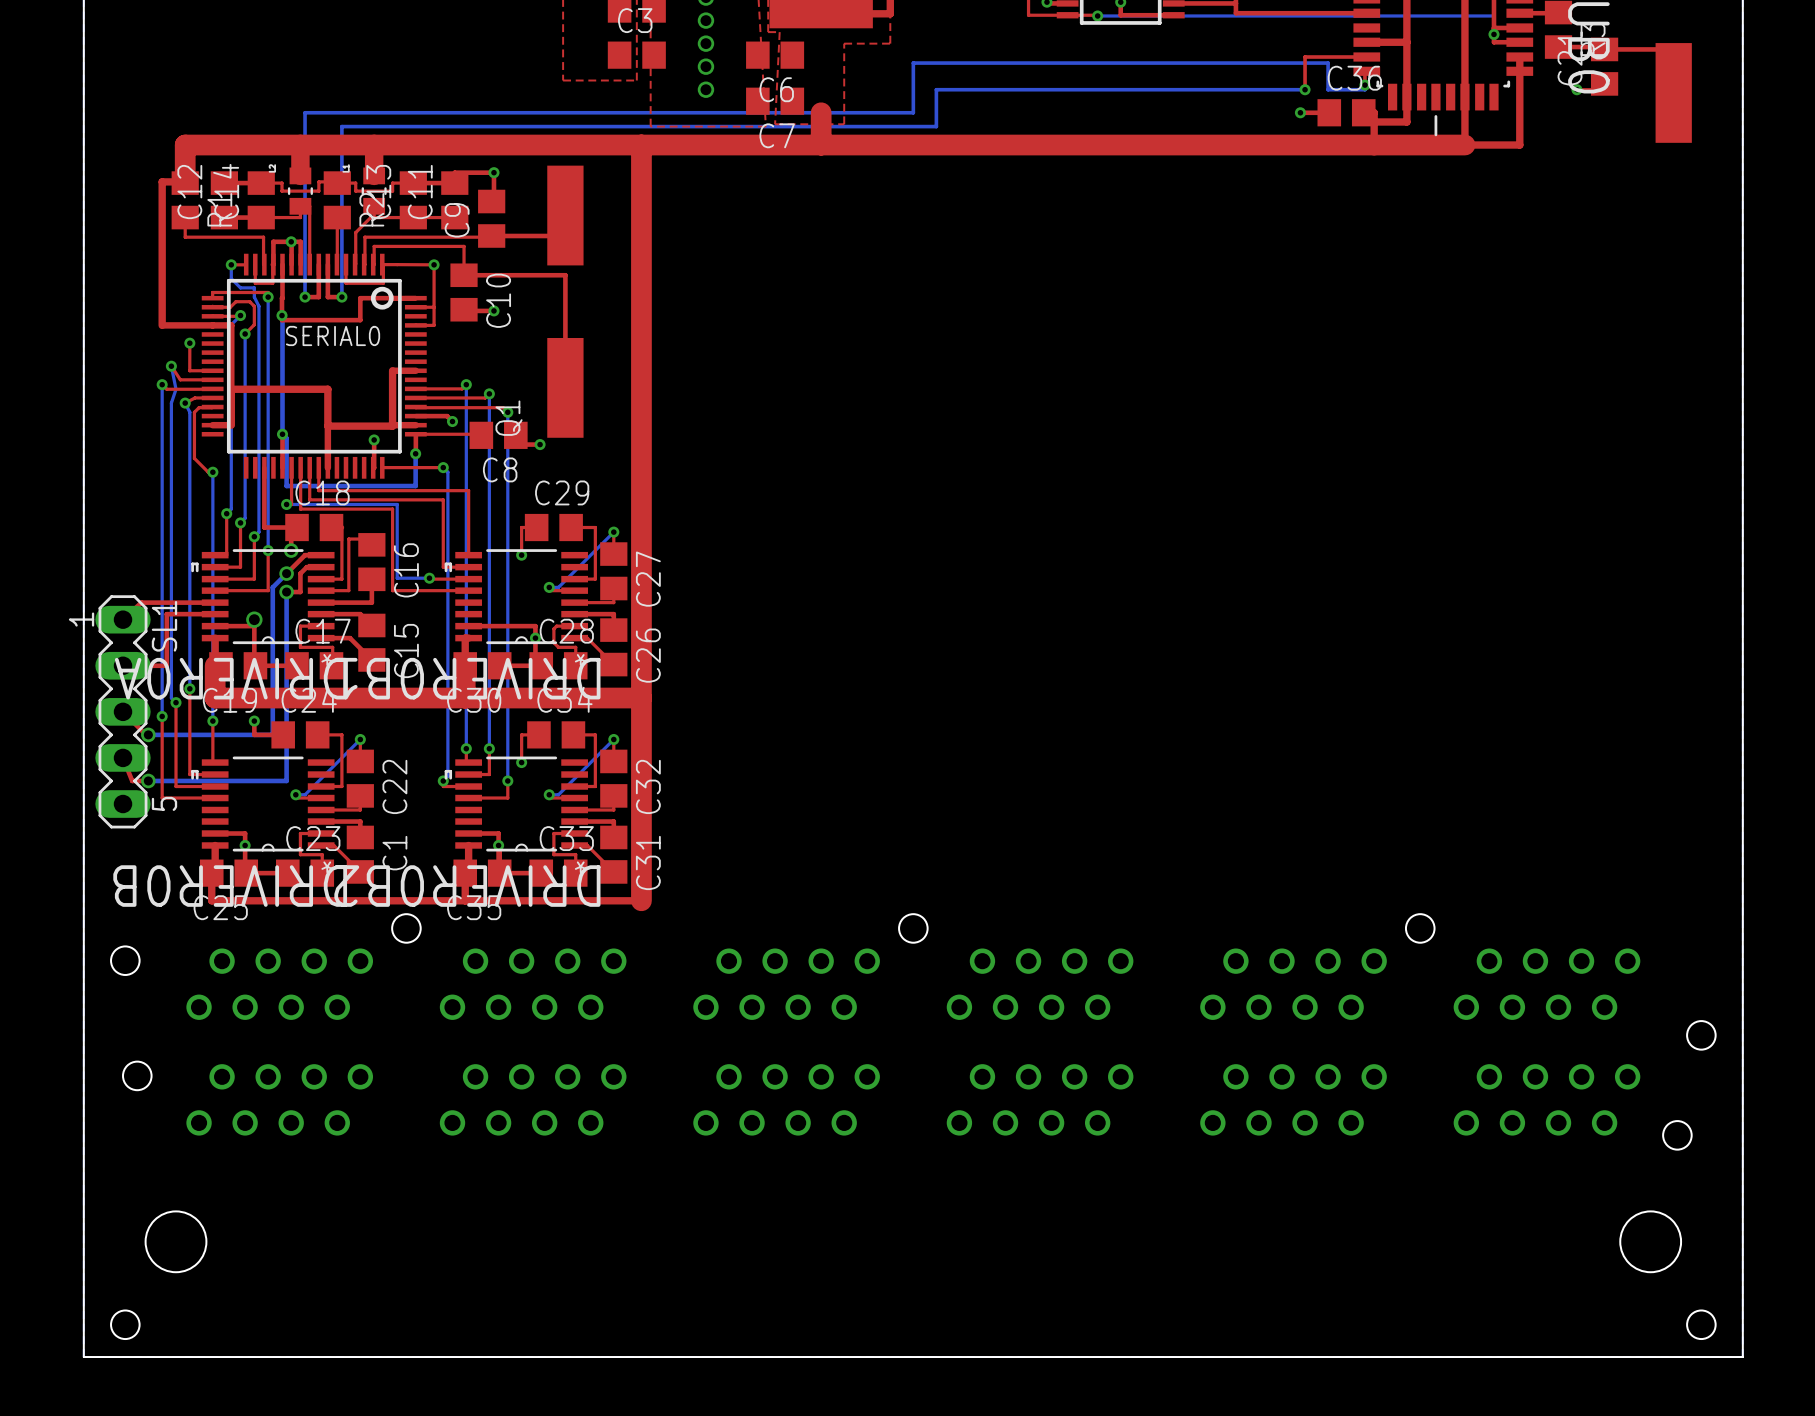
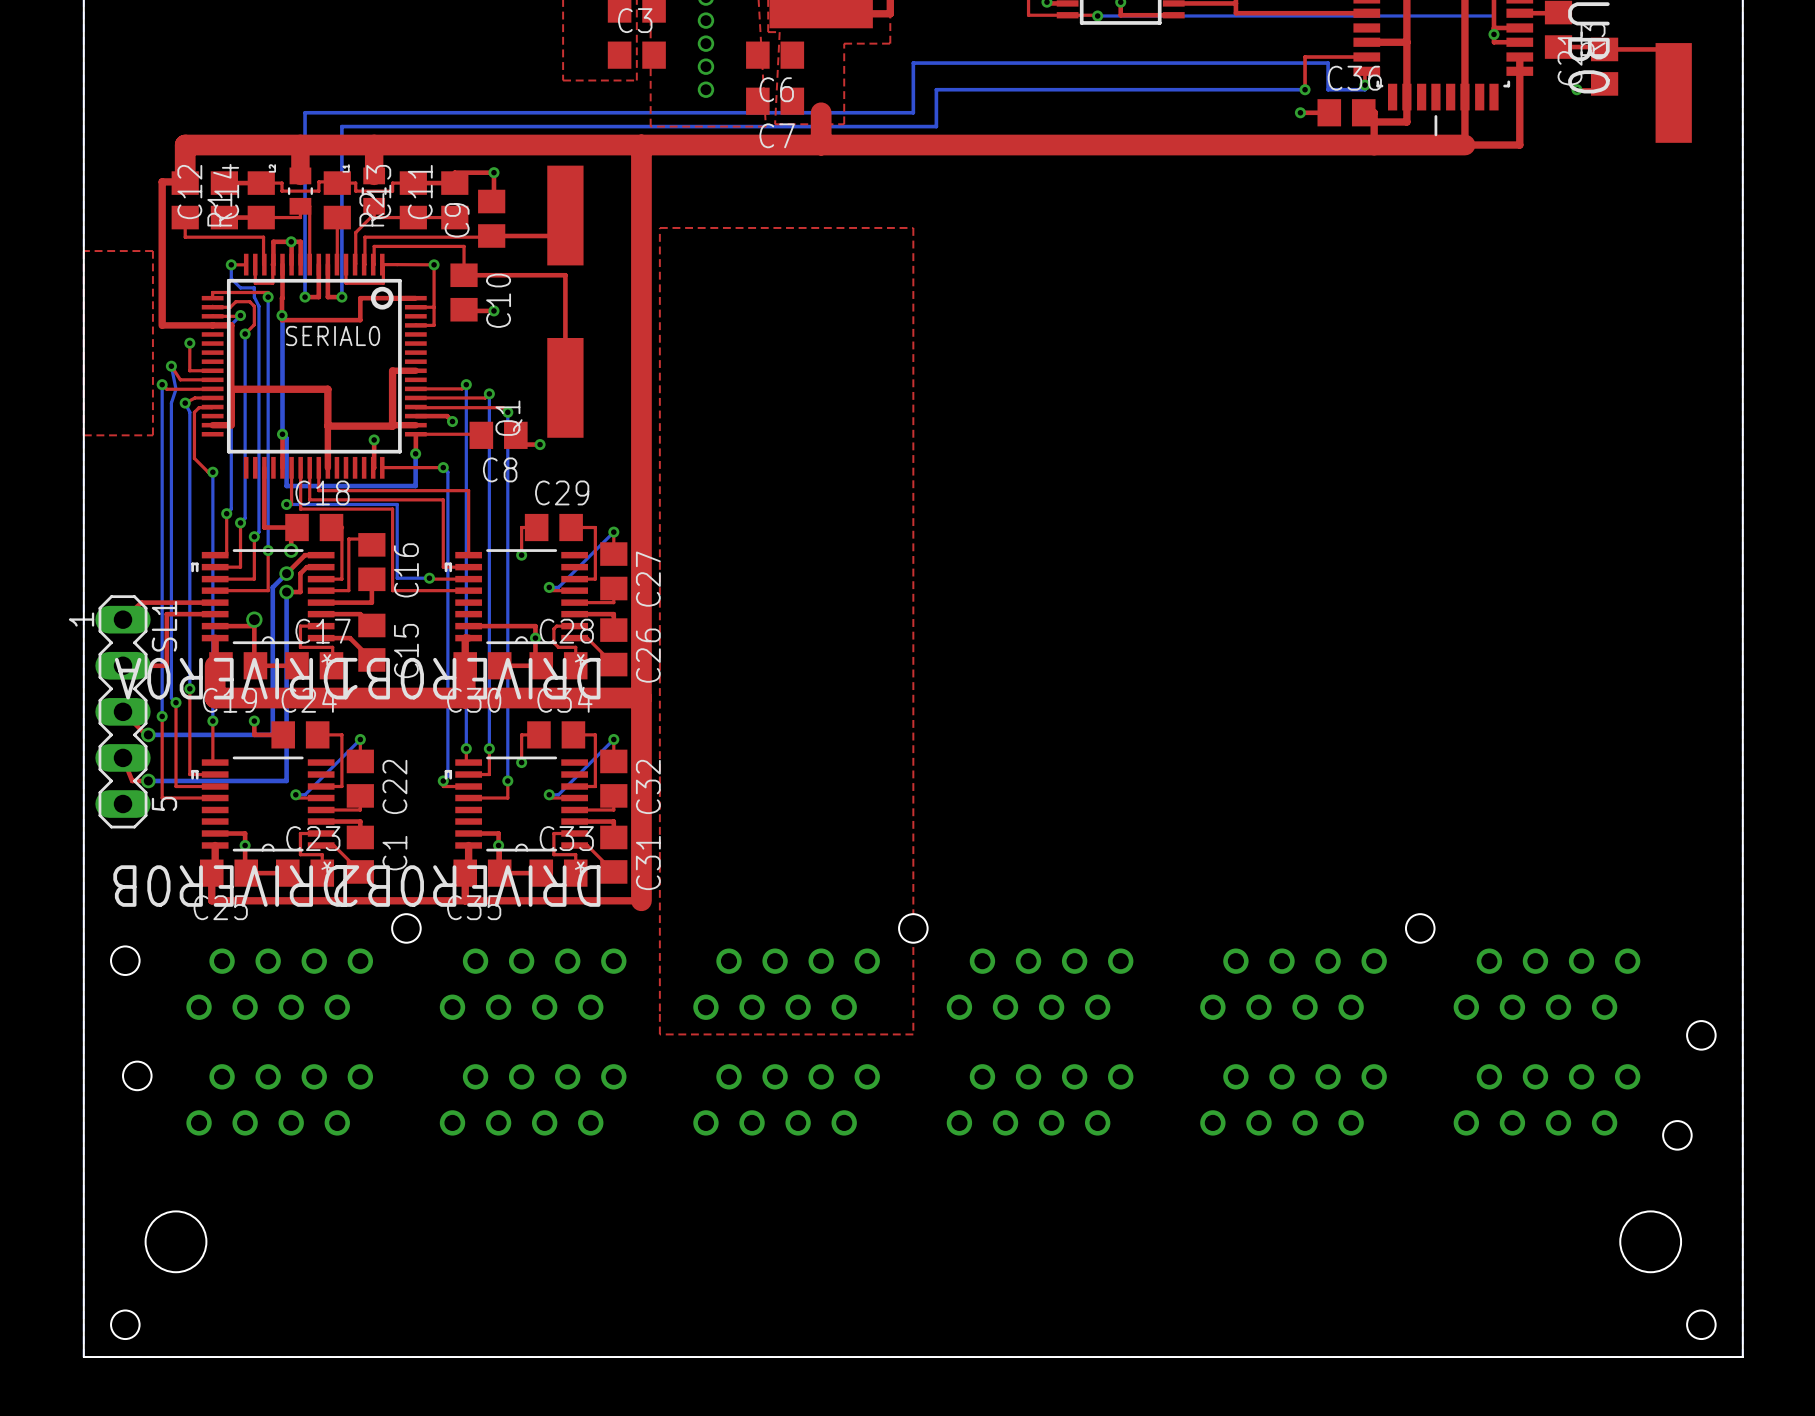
top zone outline: none -> (659, 227) (659, 1034) (913, 1034) (913, 227) (659, 227)
top zone outline: none -> (83, 251) (152, 251) (152, 435) (83, 435) (83, 251)

